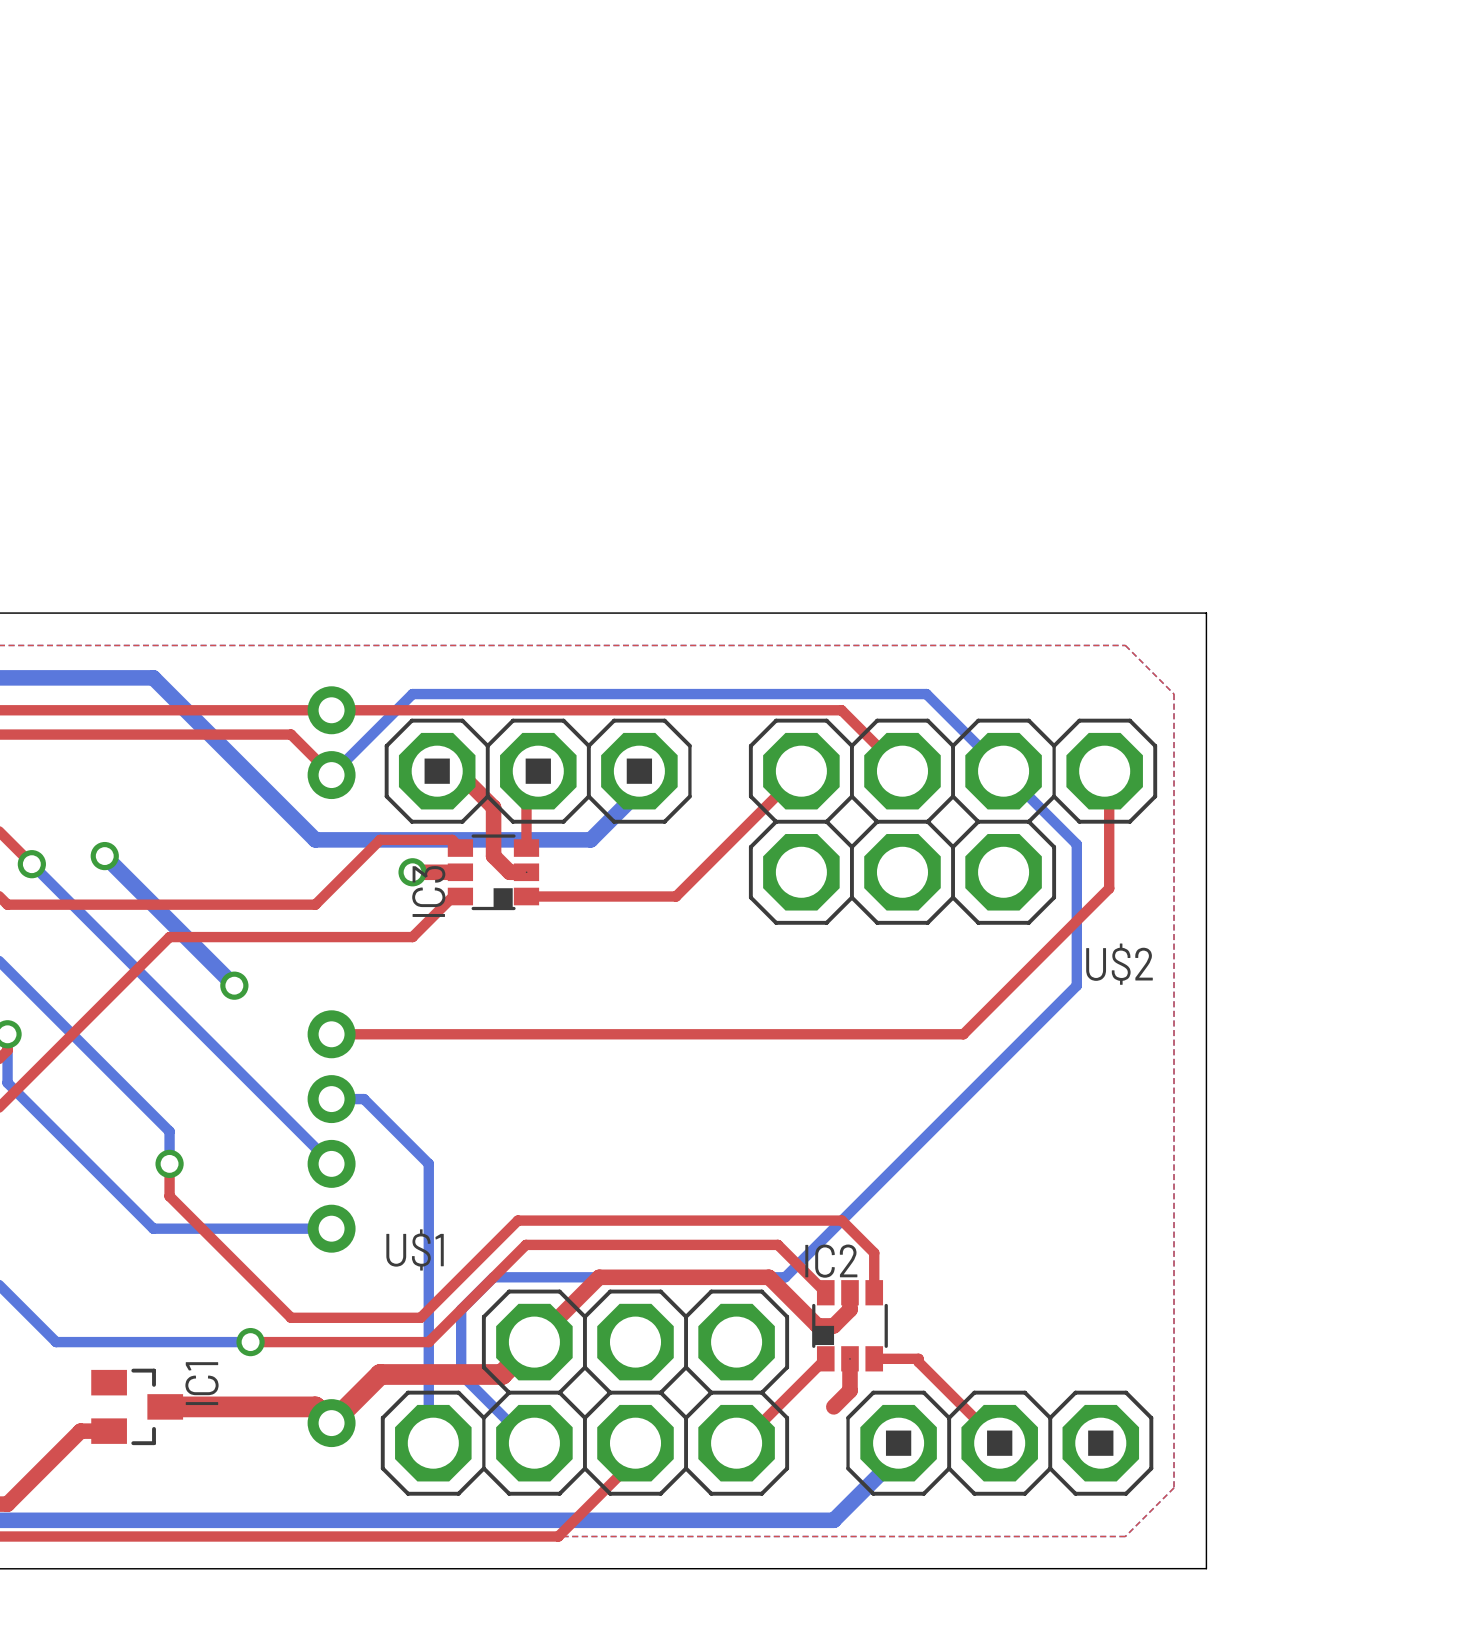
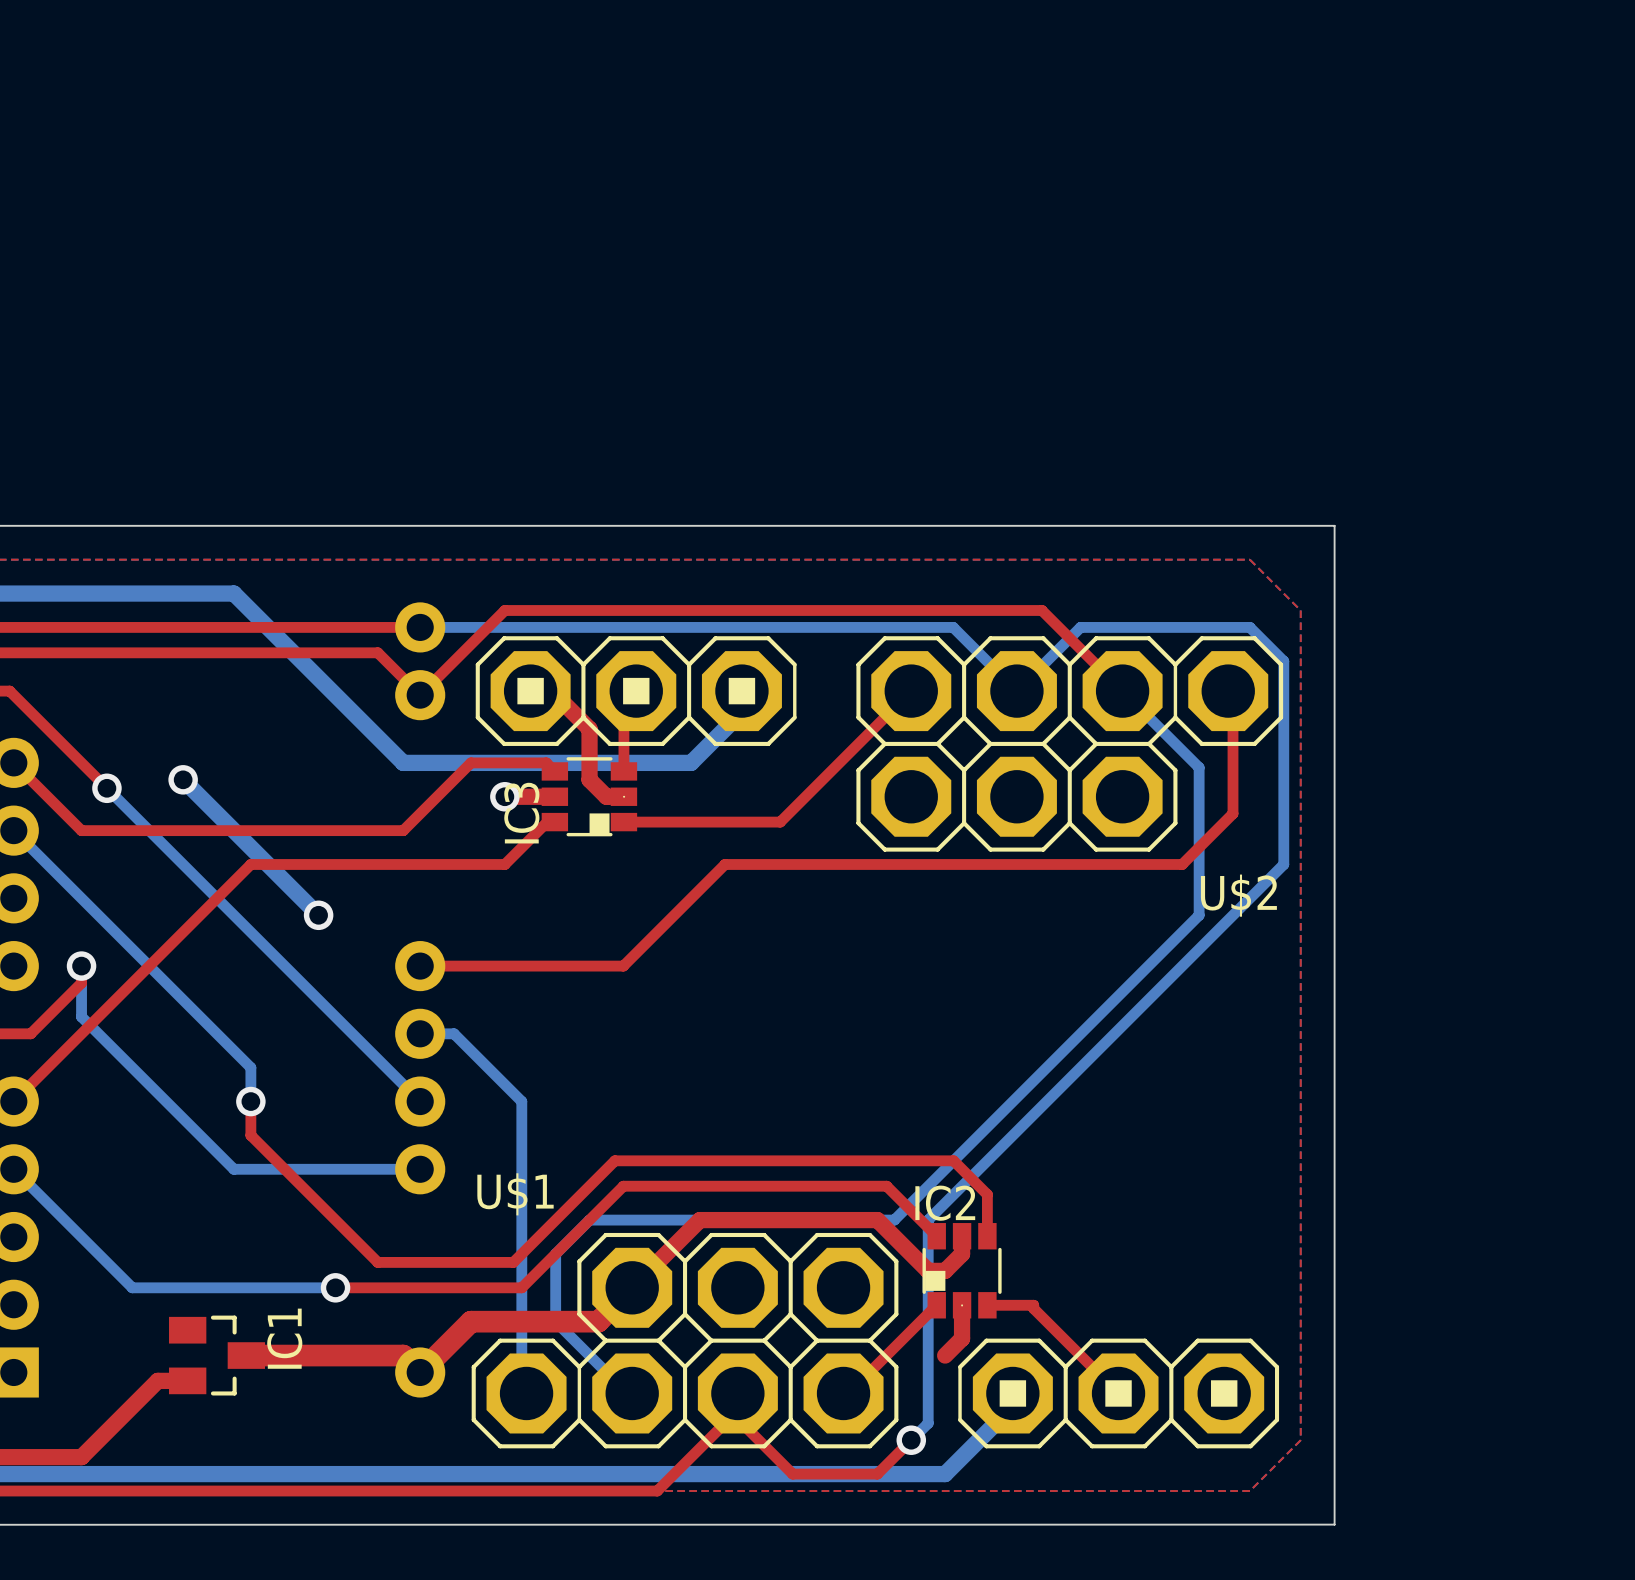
top track: (331, 710) (841, 710) (902, 771) -> none
bottom track: none -> (420, 627) (953, 627) (1016, 691) (1080, 627) (1249, 627) (1283, 661) (1283, 864) (928, 1220) (928, 1423) (911, 1440)
top track: none -> (1122, 691) (1041, 610) (504, 610) (420, 695)
bottom track: (1003, 771) (926, 694) (412, 694) (331, 775) -> none
top track: (1060, 937) (963, 1034) (525, 1034) -> (1182, 864) (725, 864) (623, 966)
top track: none -> (733, 1414) (792, 1474) (877, 1474) (911, 1440)
via: none -> (911, 1440)

